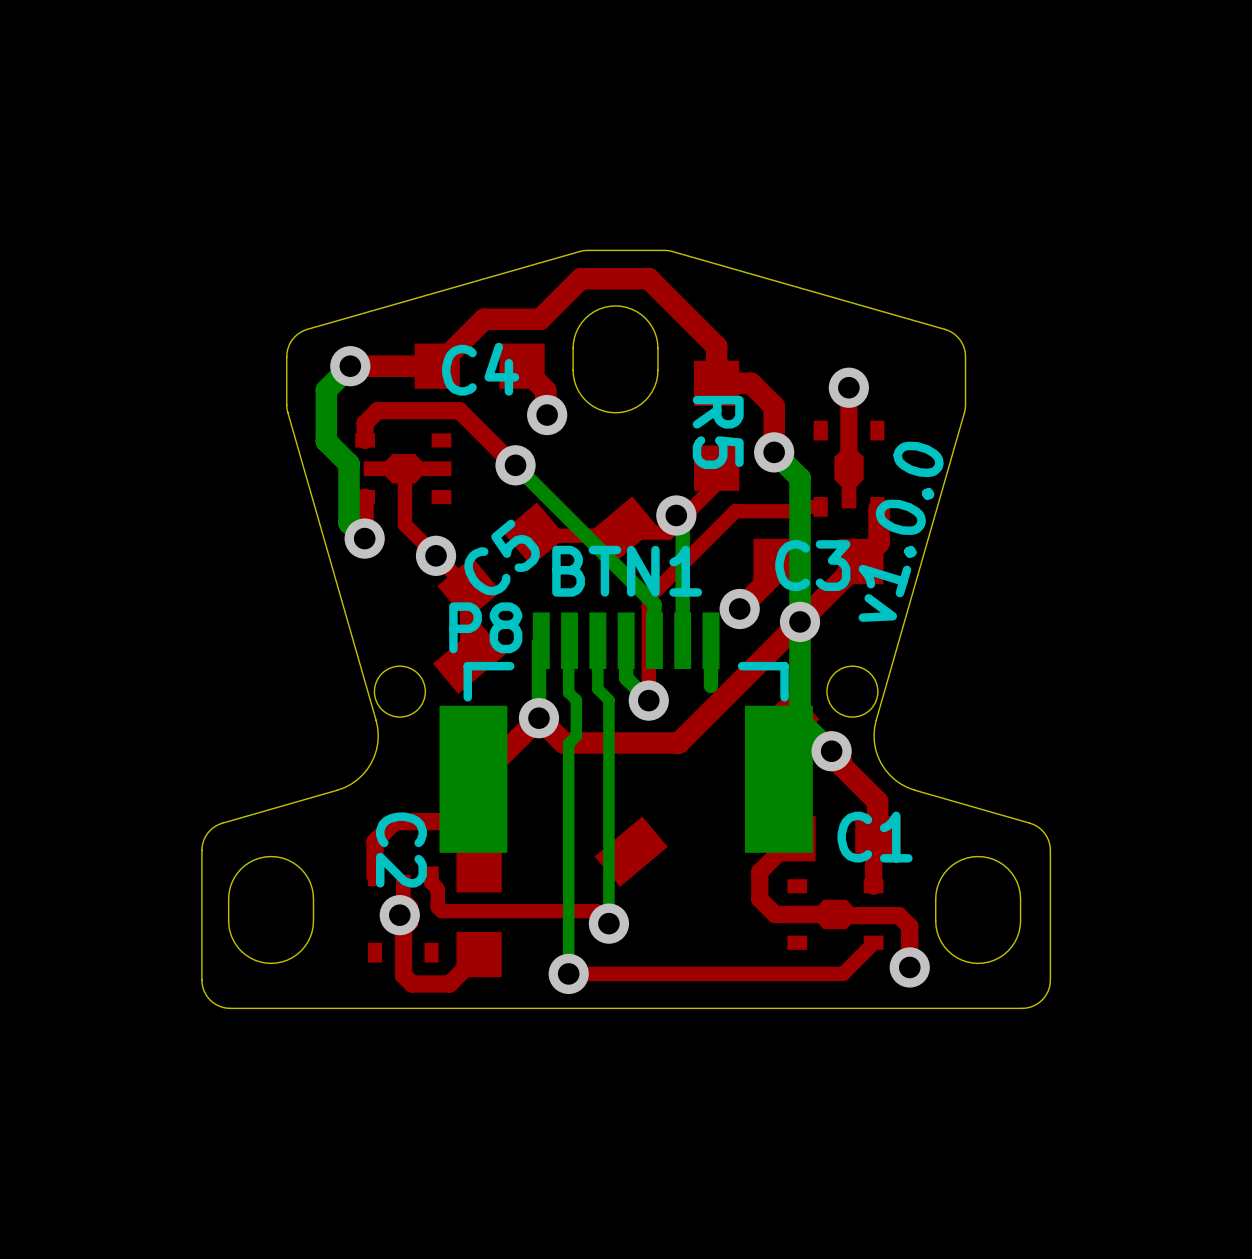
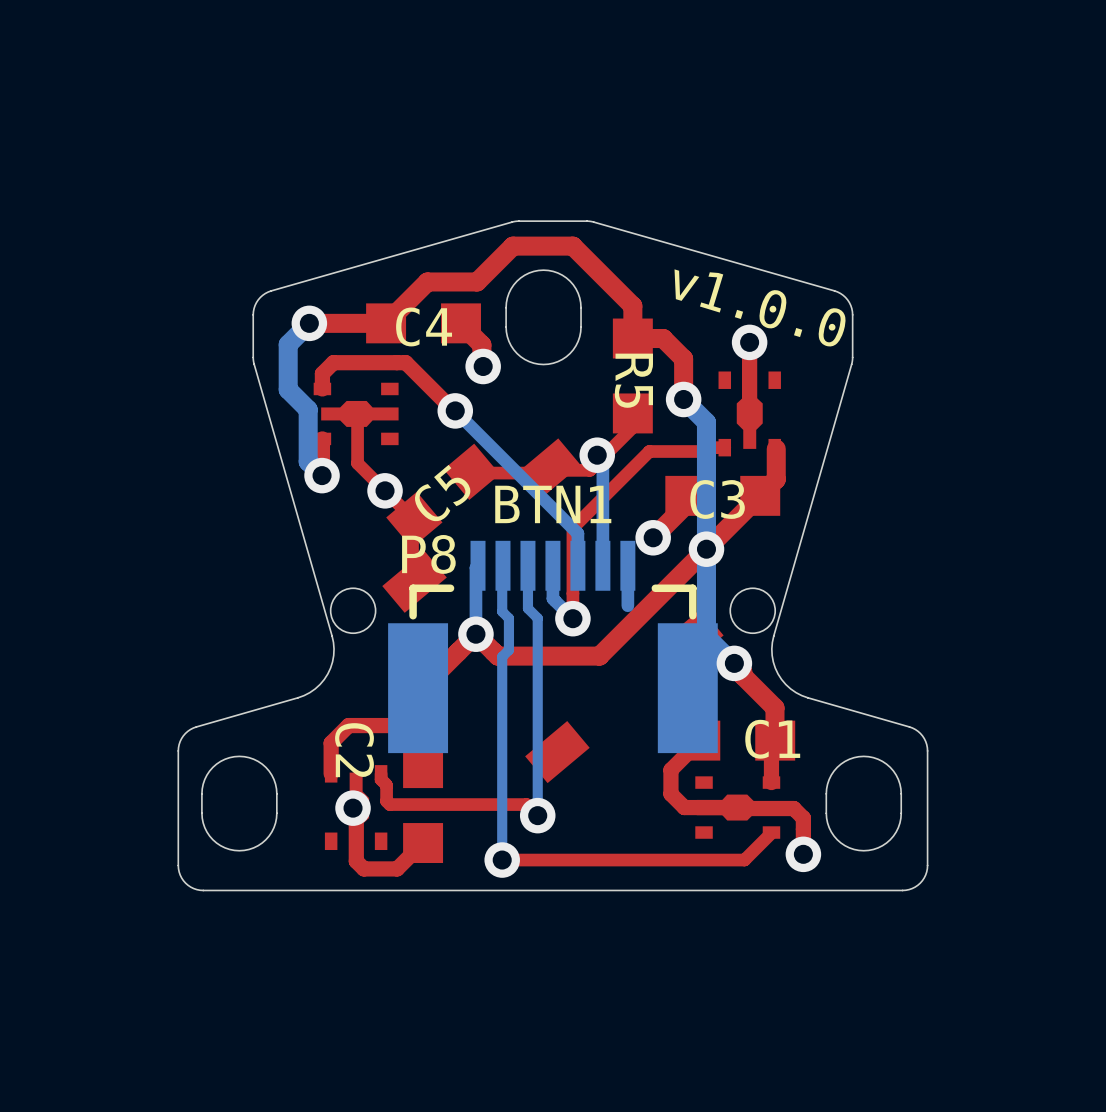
text rotation: 0° (901, 531) -> 90° clockwise (760, 308)

